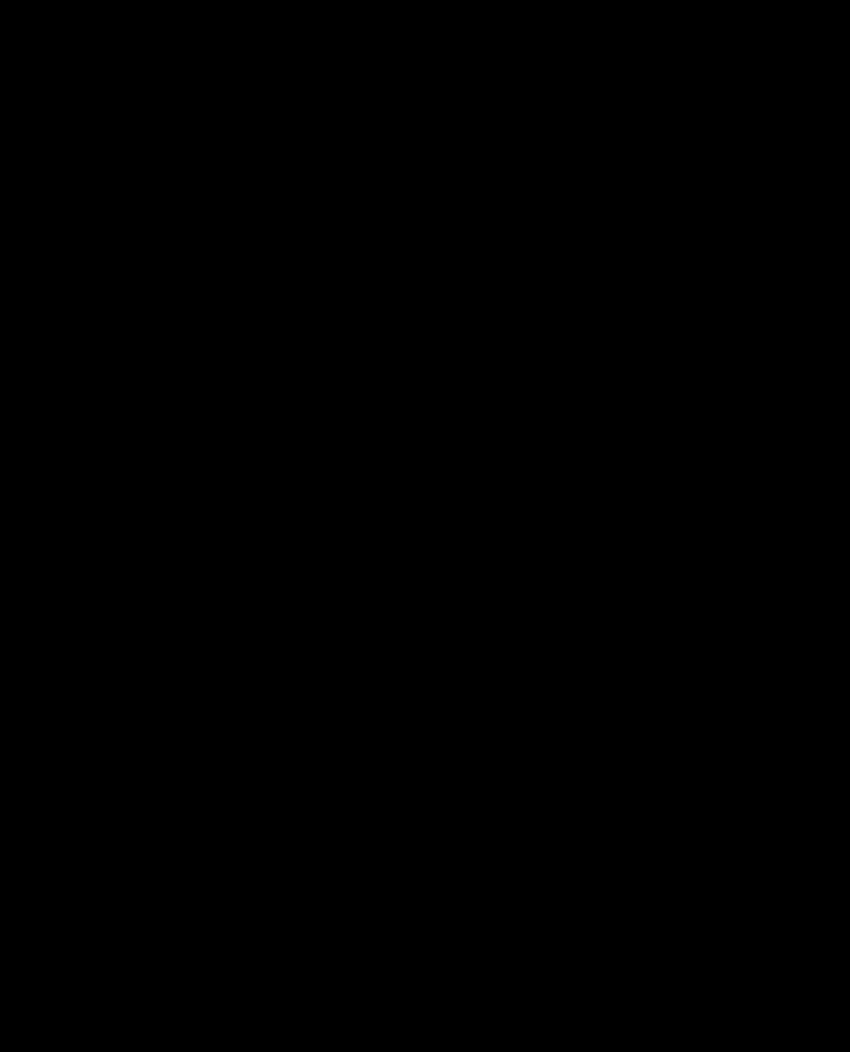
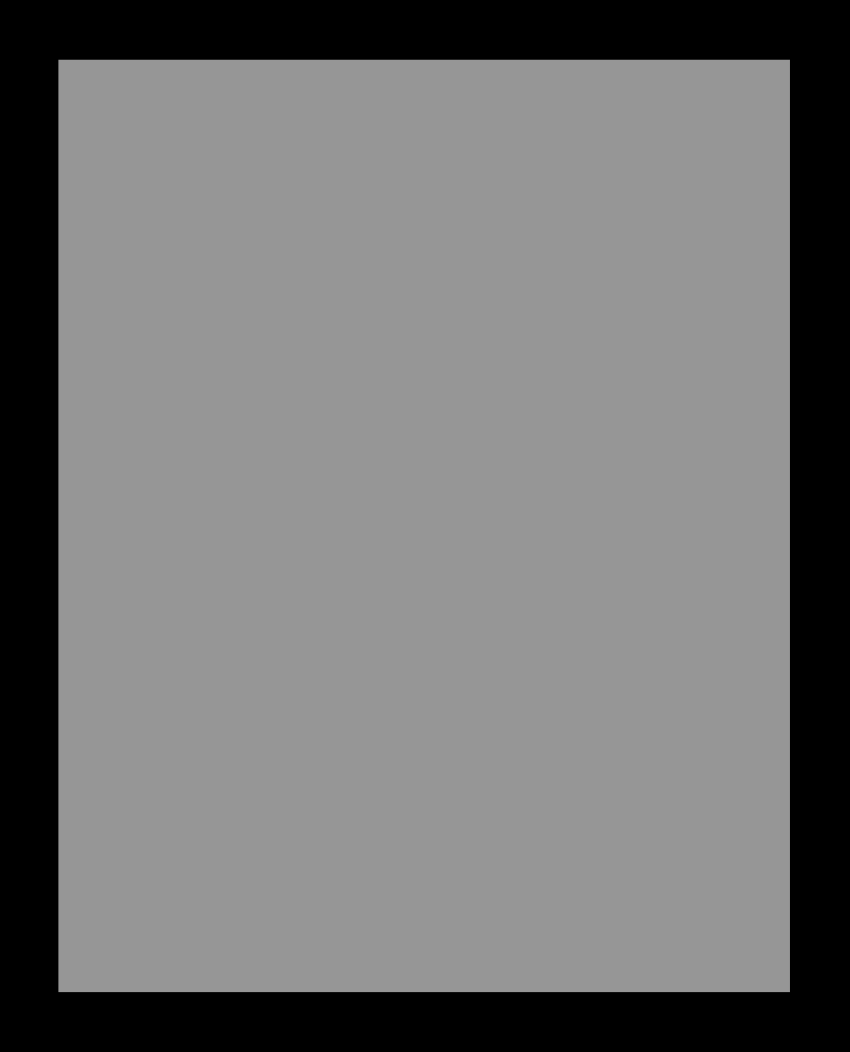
drawing: none -> [58, 59, 790, 993]

